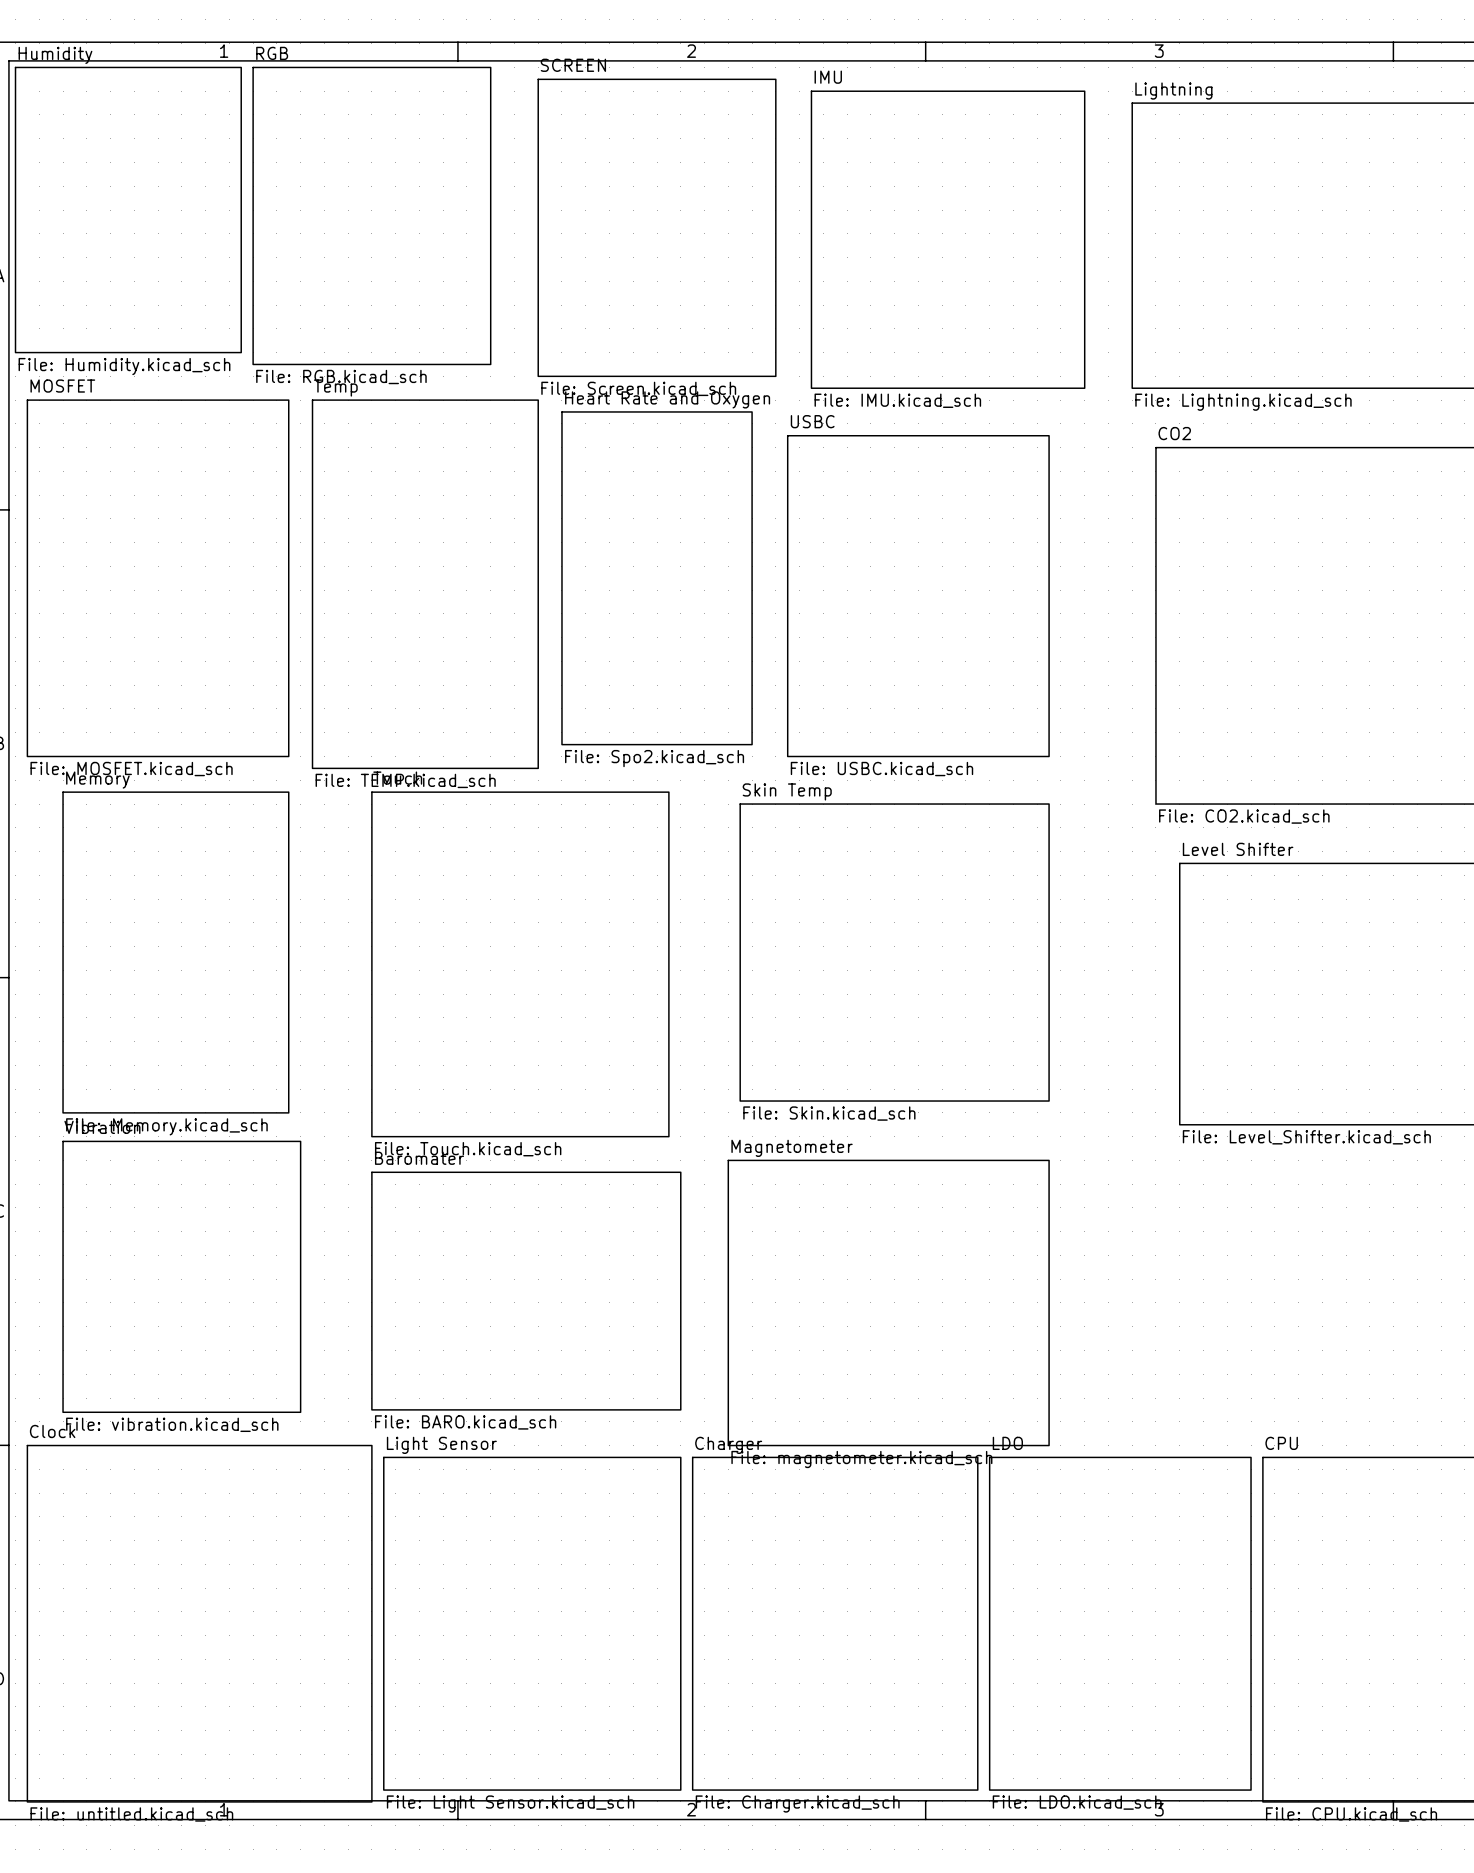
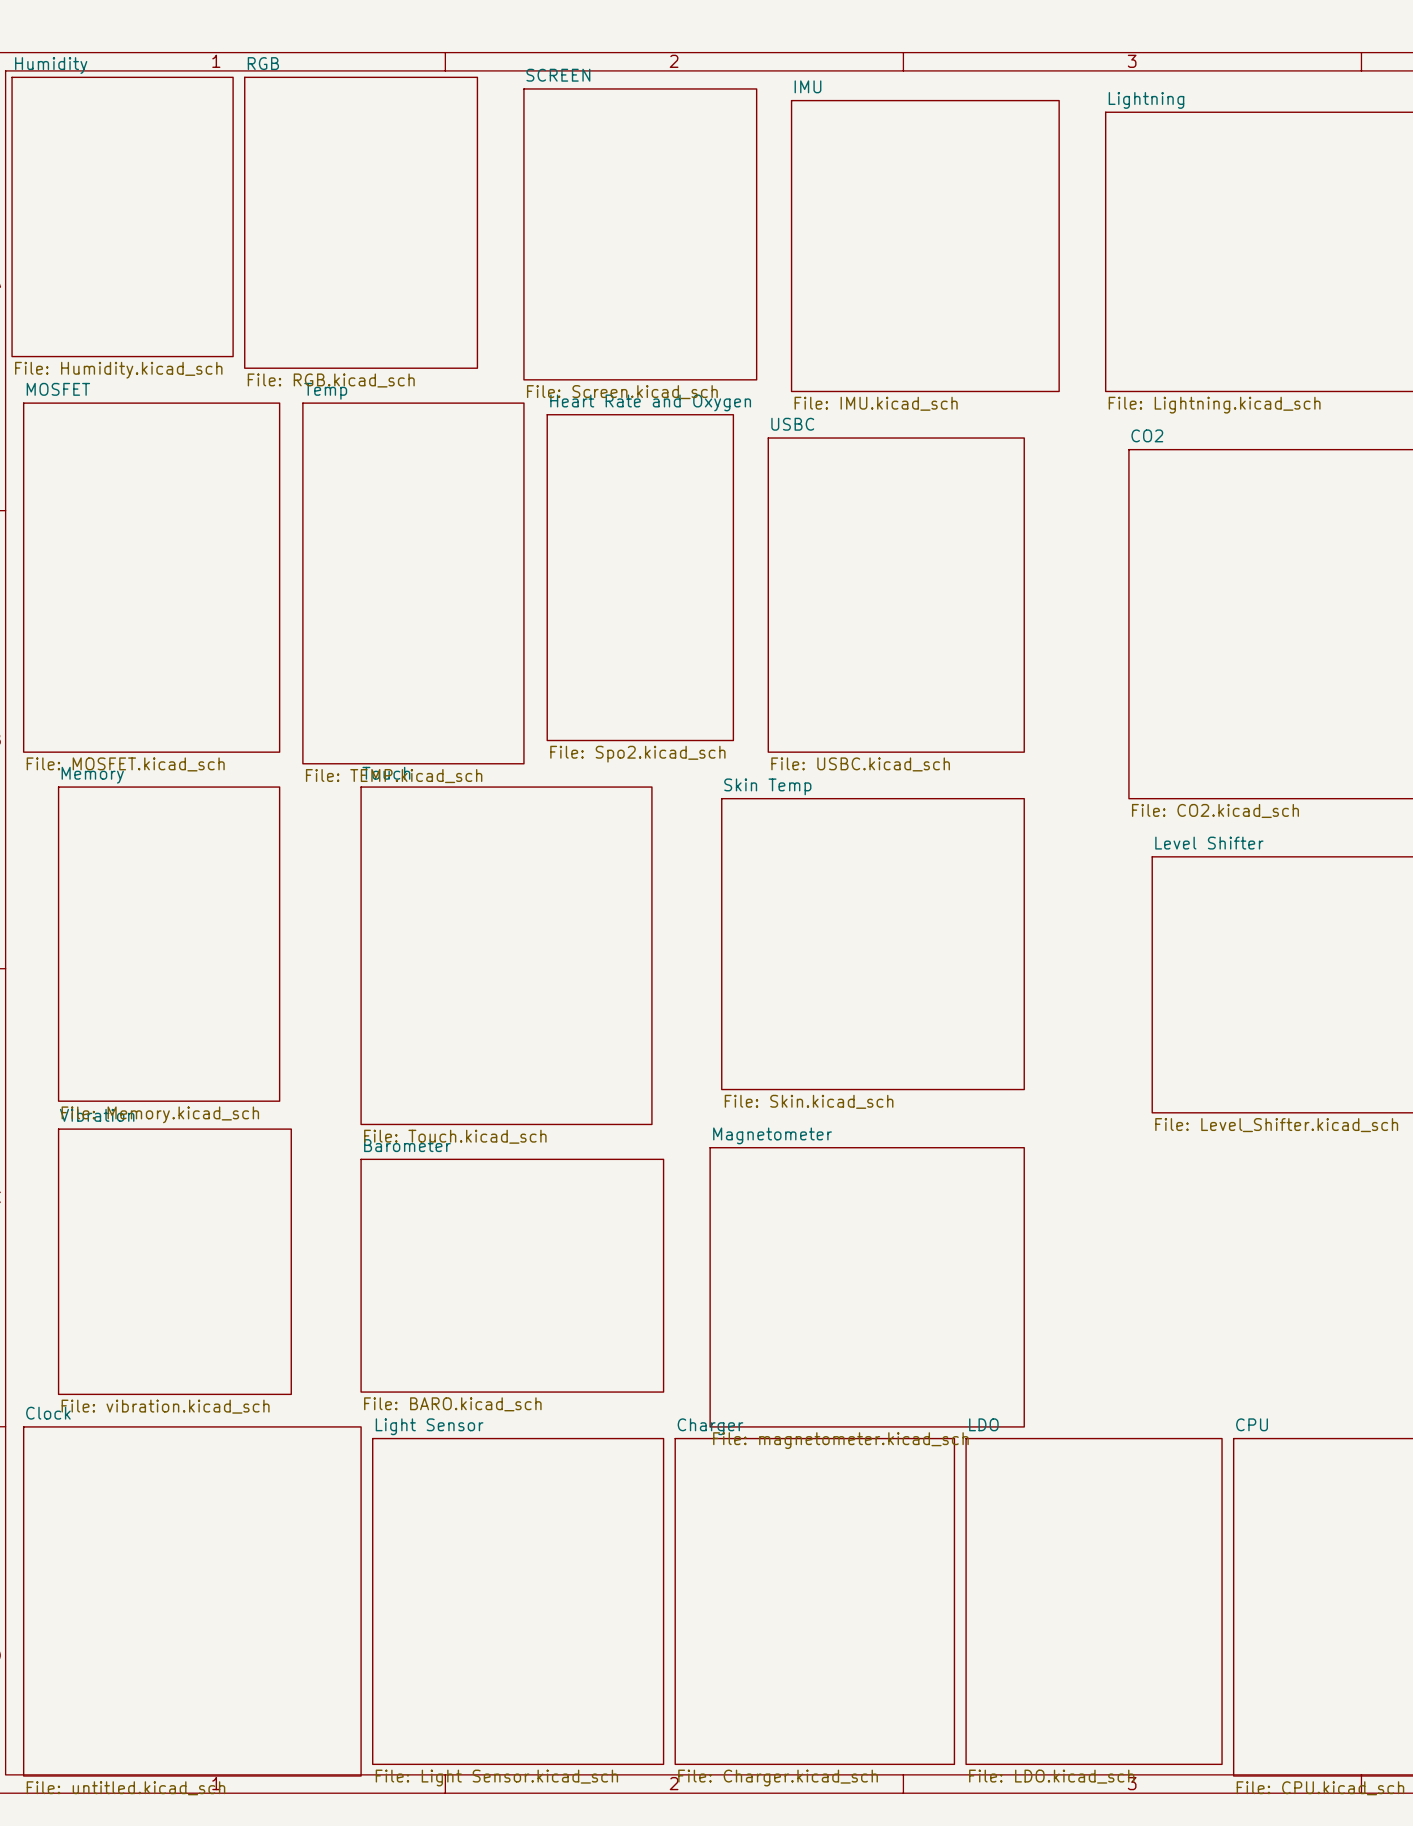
sheet Baromater name: Baromater (419, 1158) -> Barometer (407, 1145)

